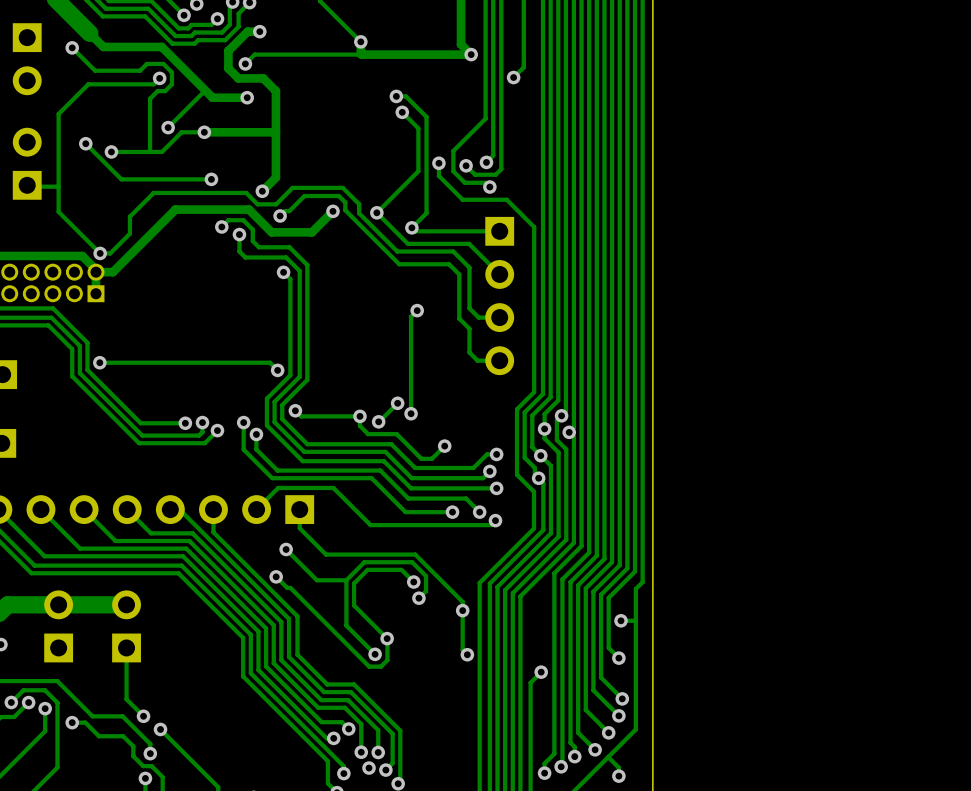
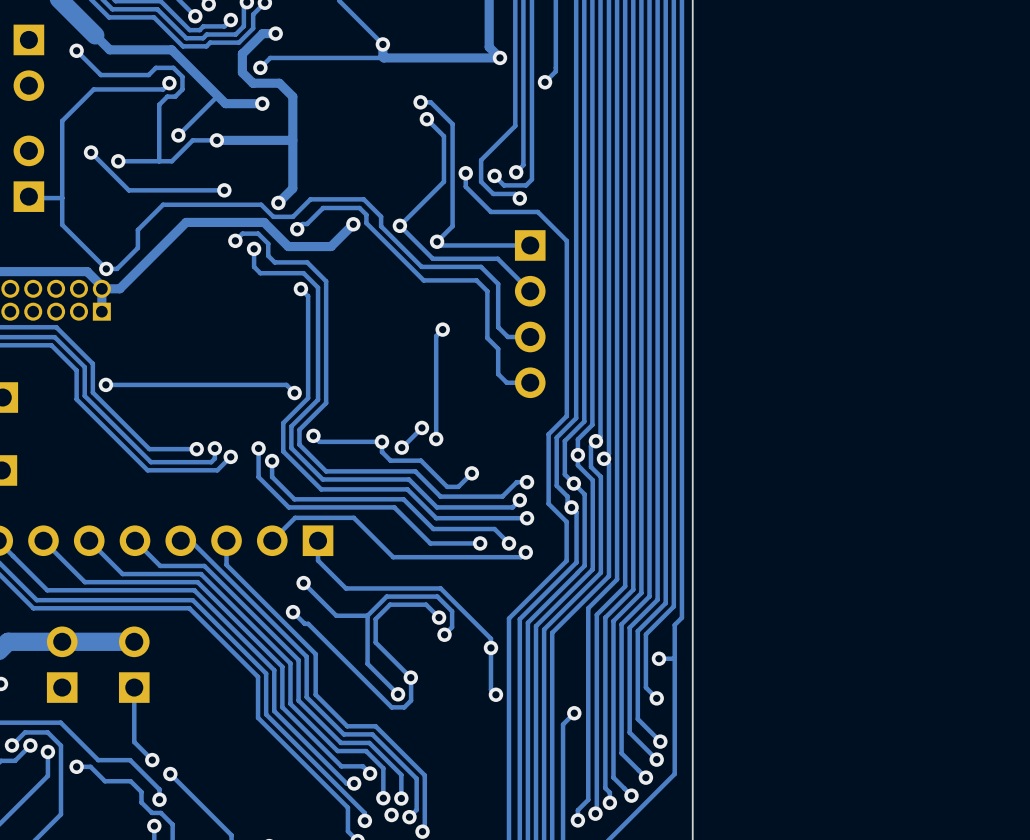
track: (608, 757) (618, 767) (618, 776) -> none
via: (618, 776) -> none

